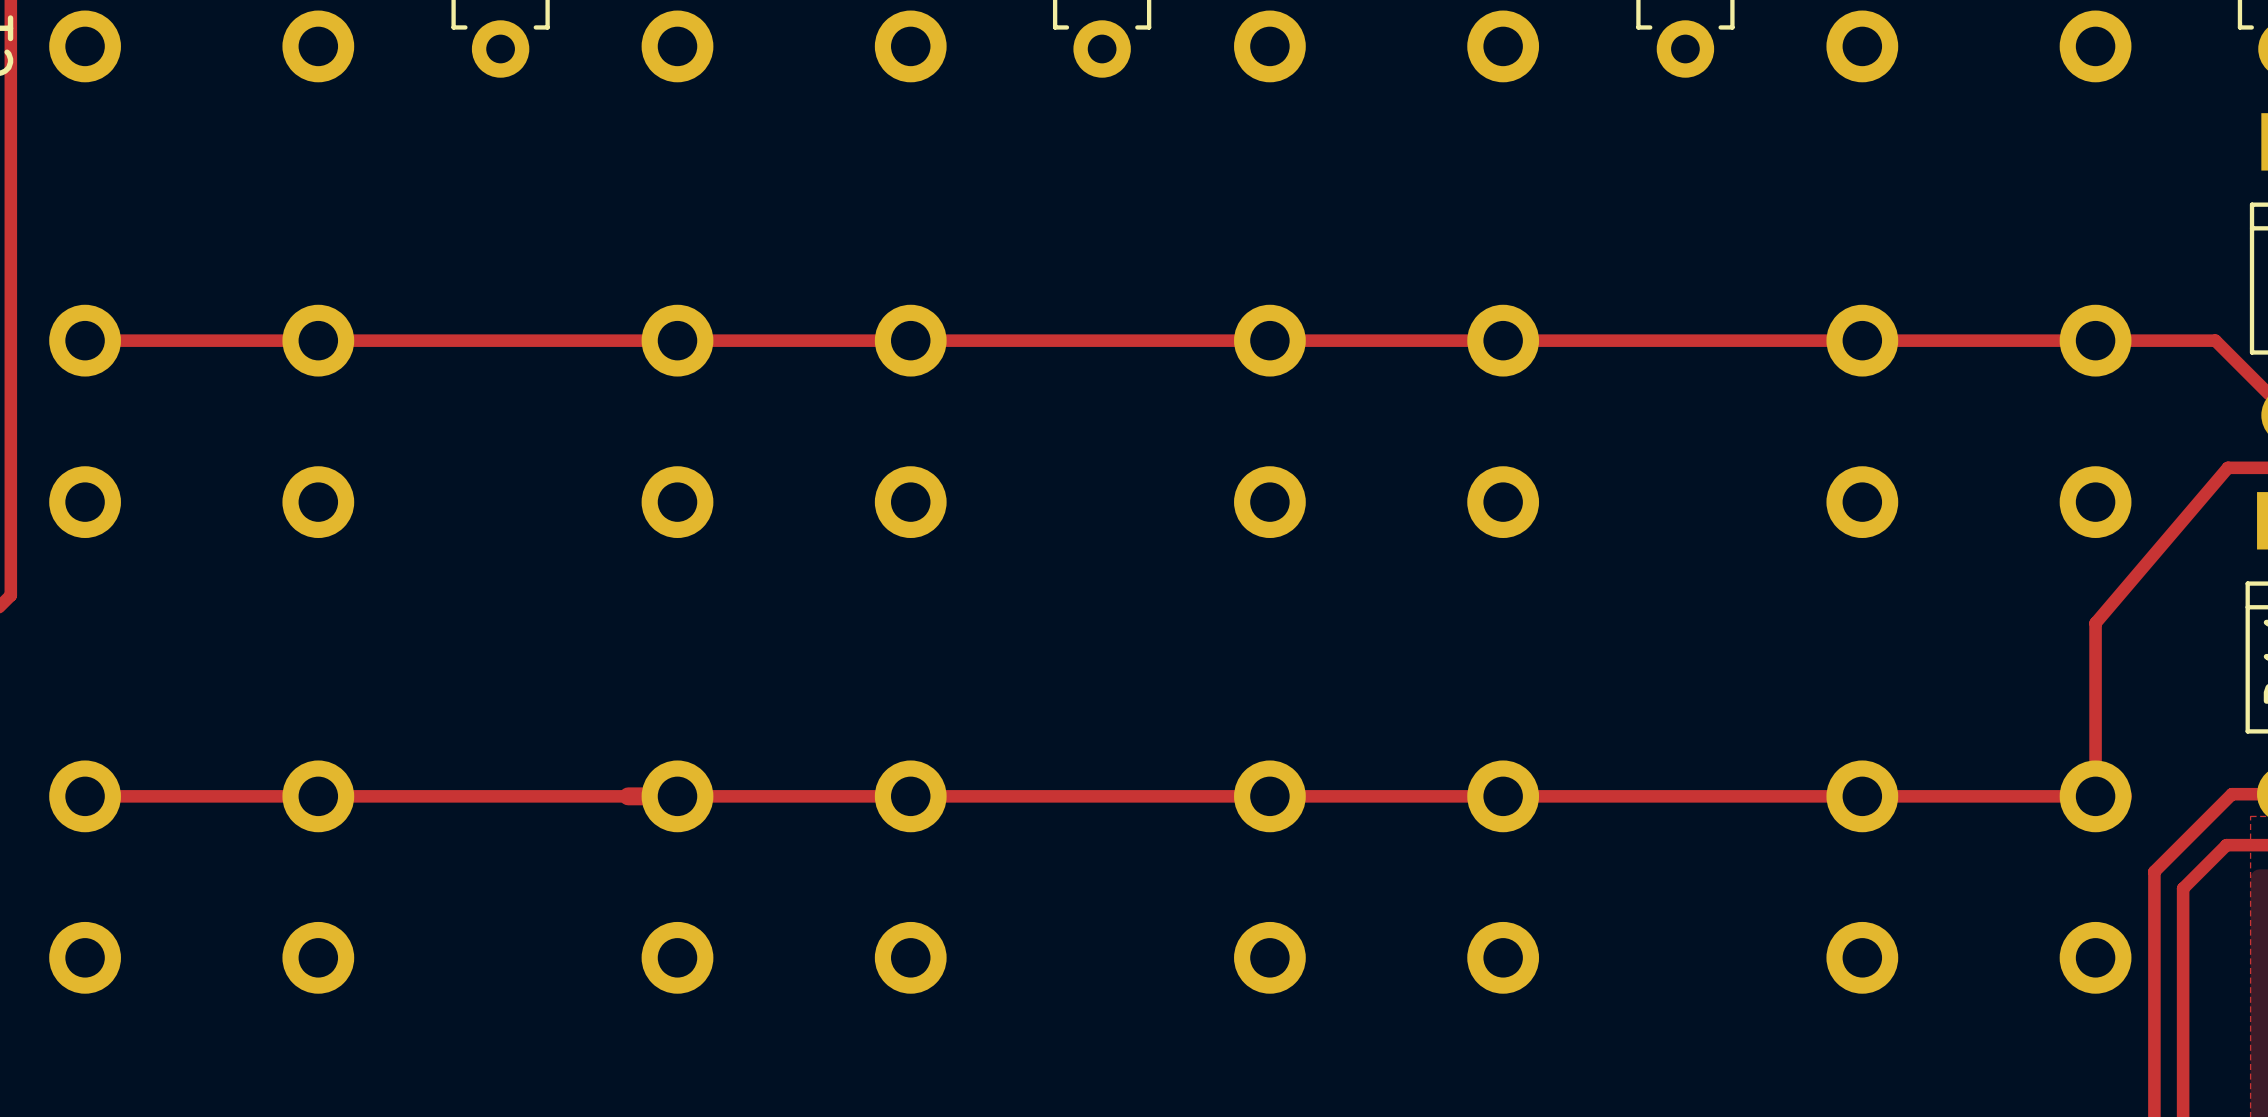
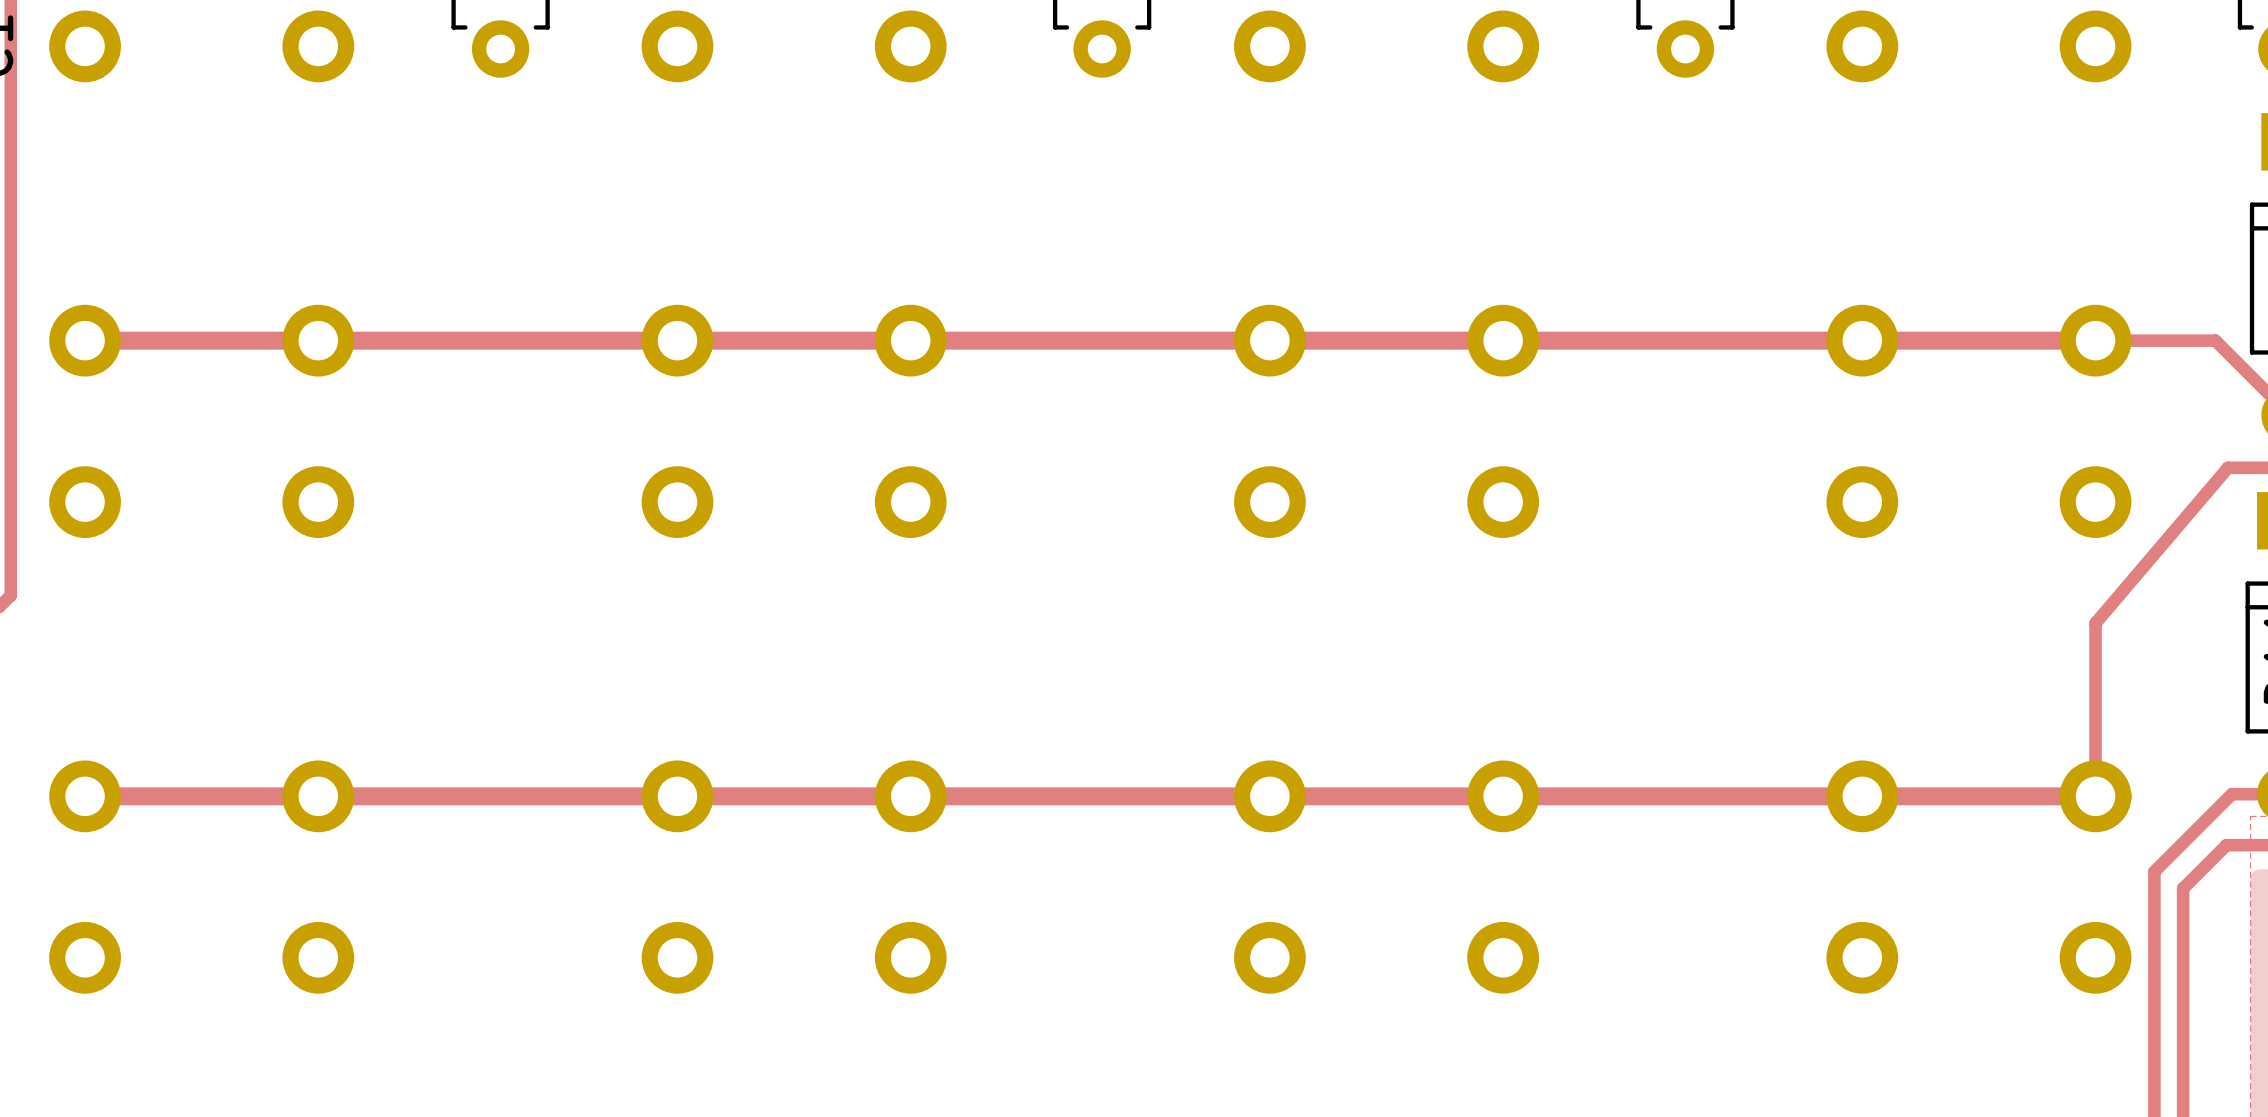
track width: thin (85, 340) (2095, 340) -> thick (85, 340) (2095, 340)
track width: thin (85, 796) (628, 796) -> thick (85, 796) (628, 796)
track width: thin (677, 796) (2095, 796) -> thick (677, 796) (2095, 796)

